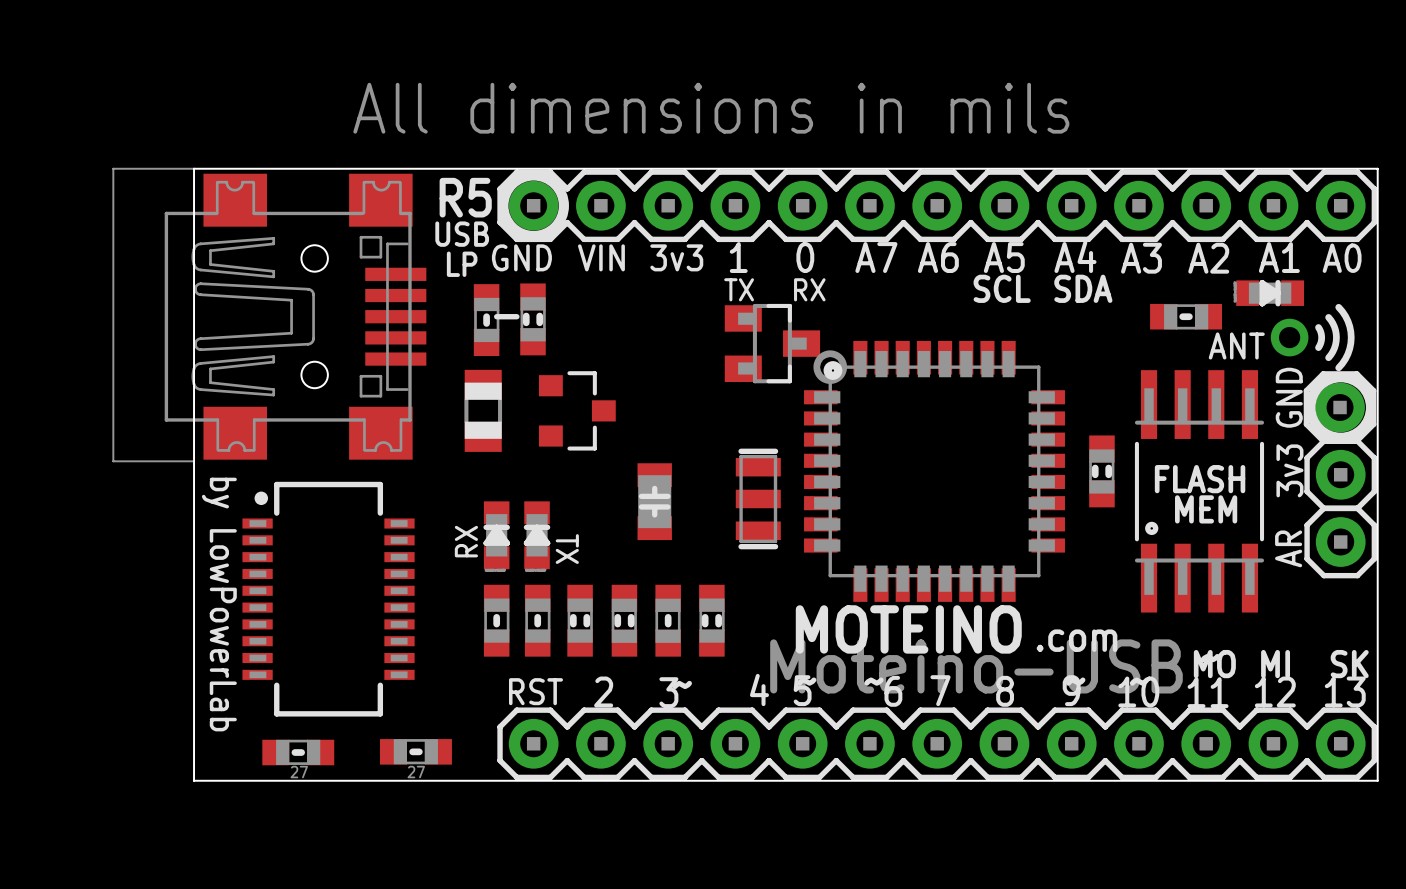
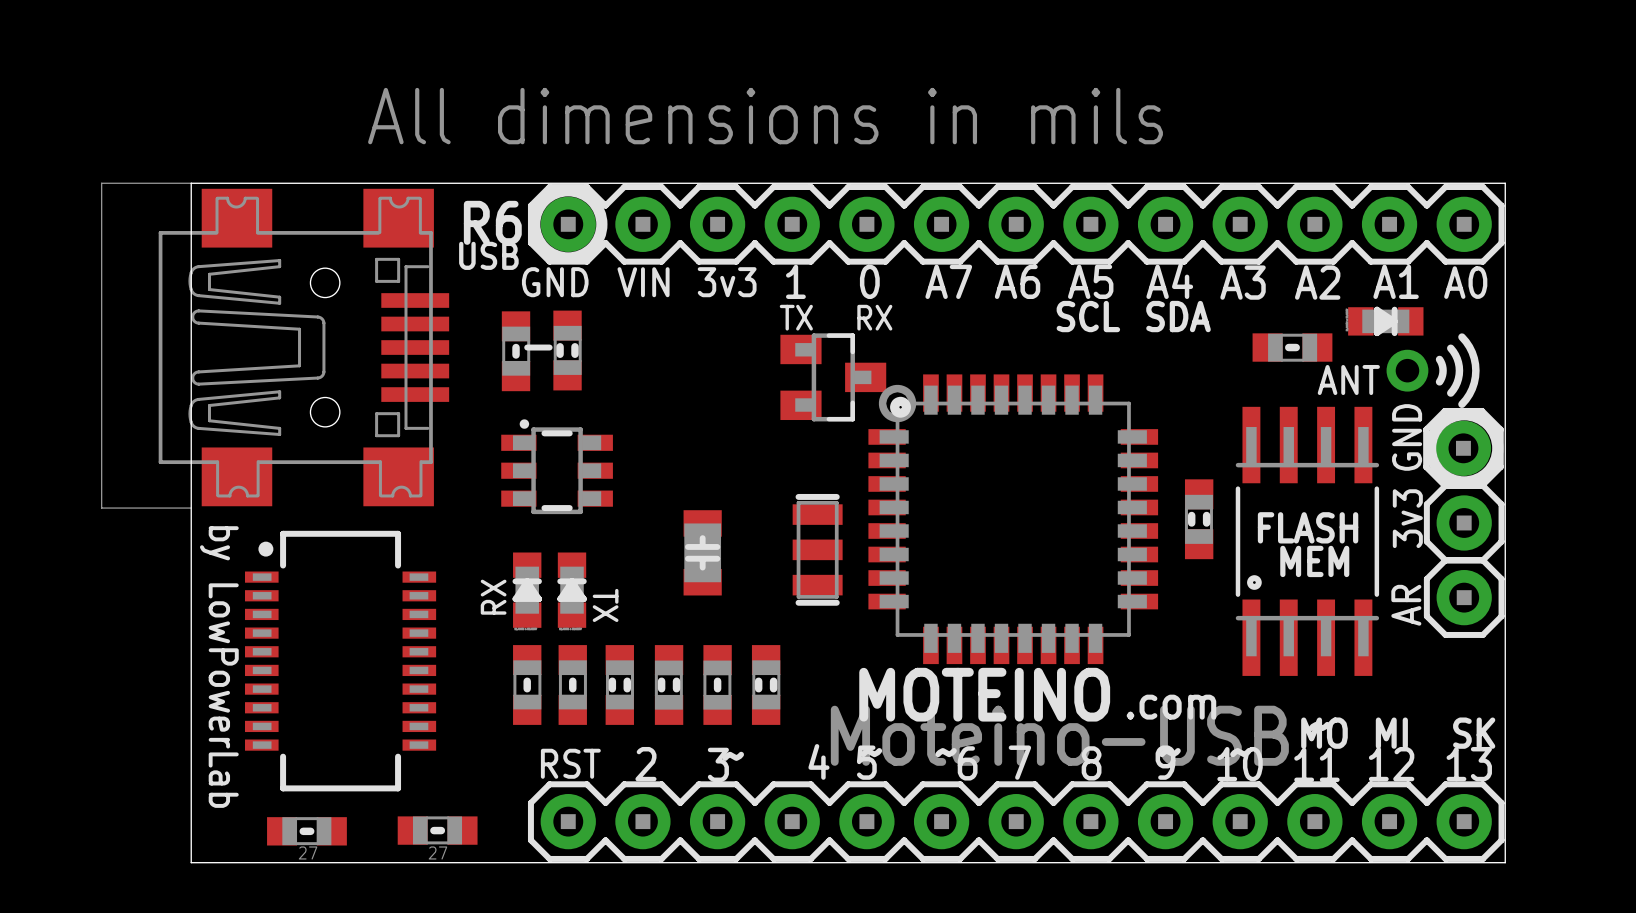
text: R5 (465, 197) -> R6 (492, 222)
text: LP (462, 264) -> none
part: (483, 410) -> none
part: (577, 410) -> none
part: none -> (557, 466)

